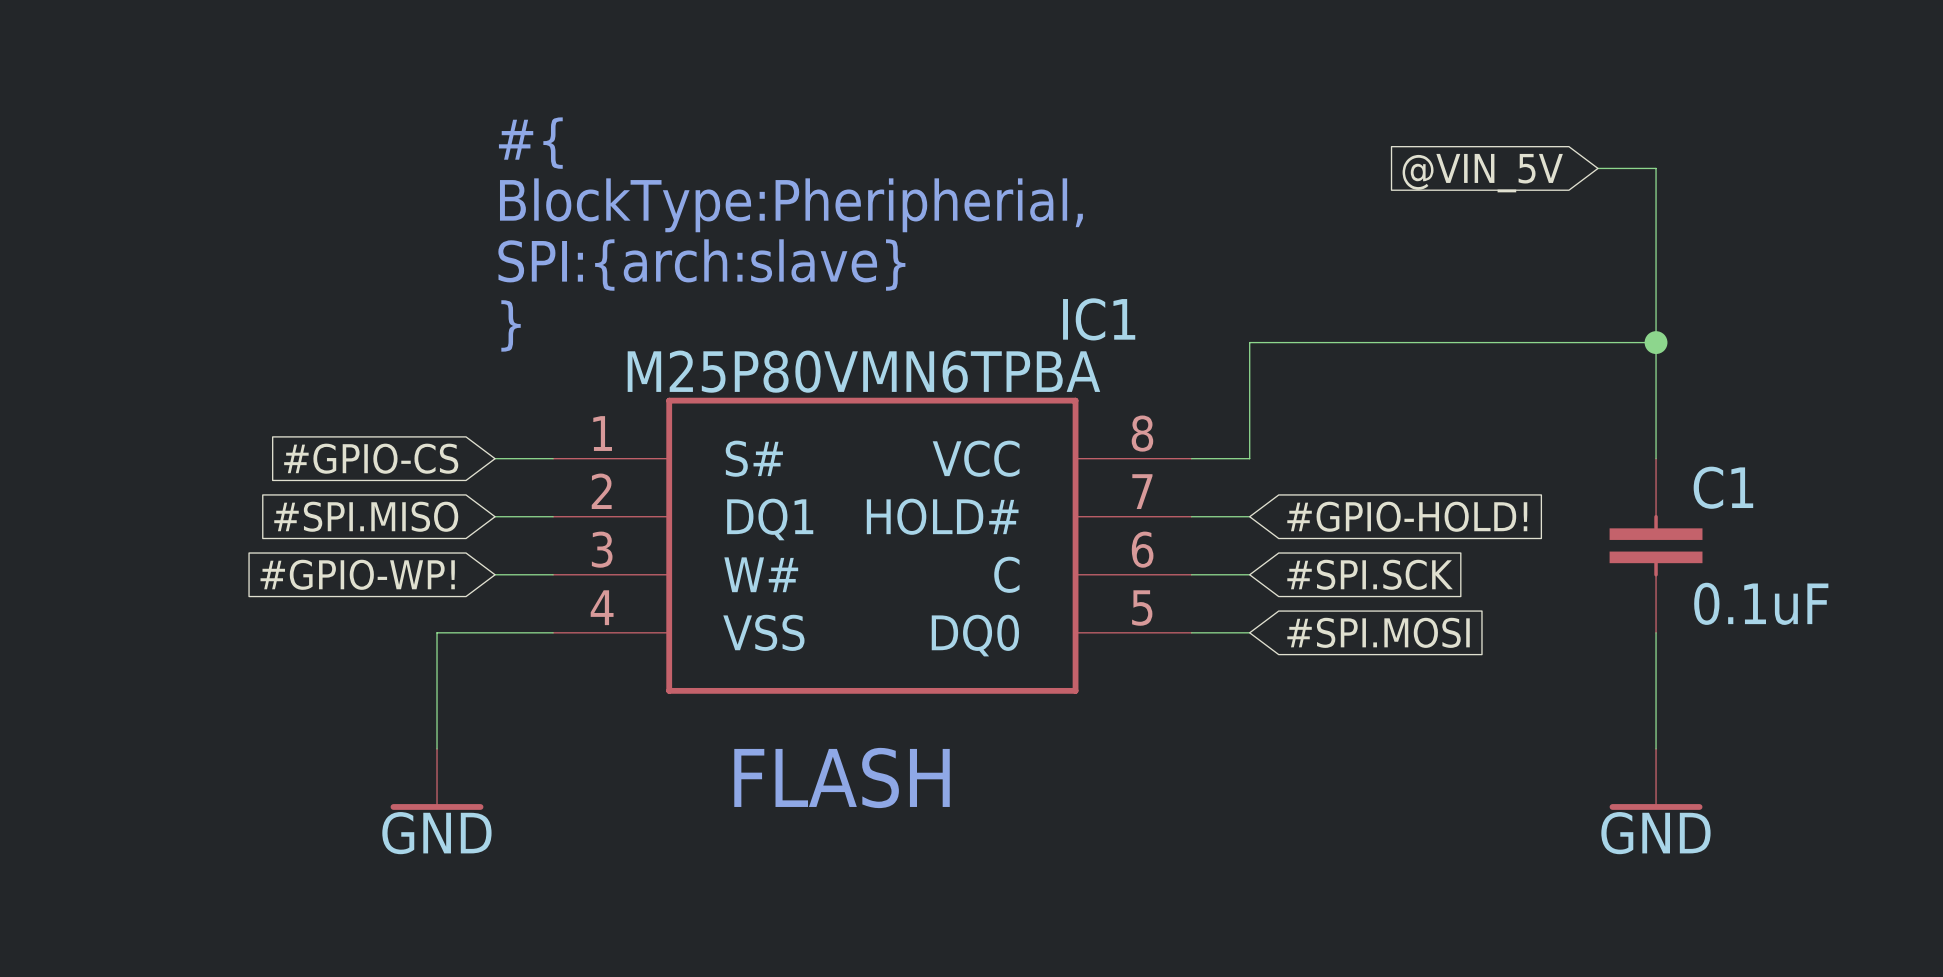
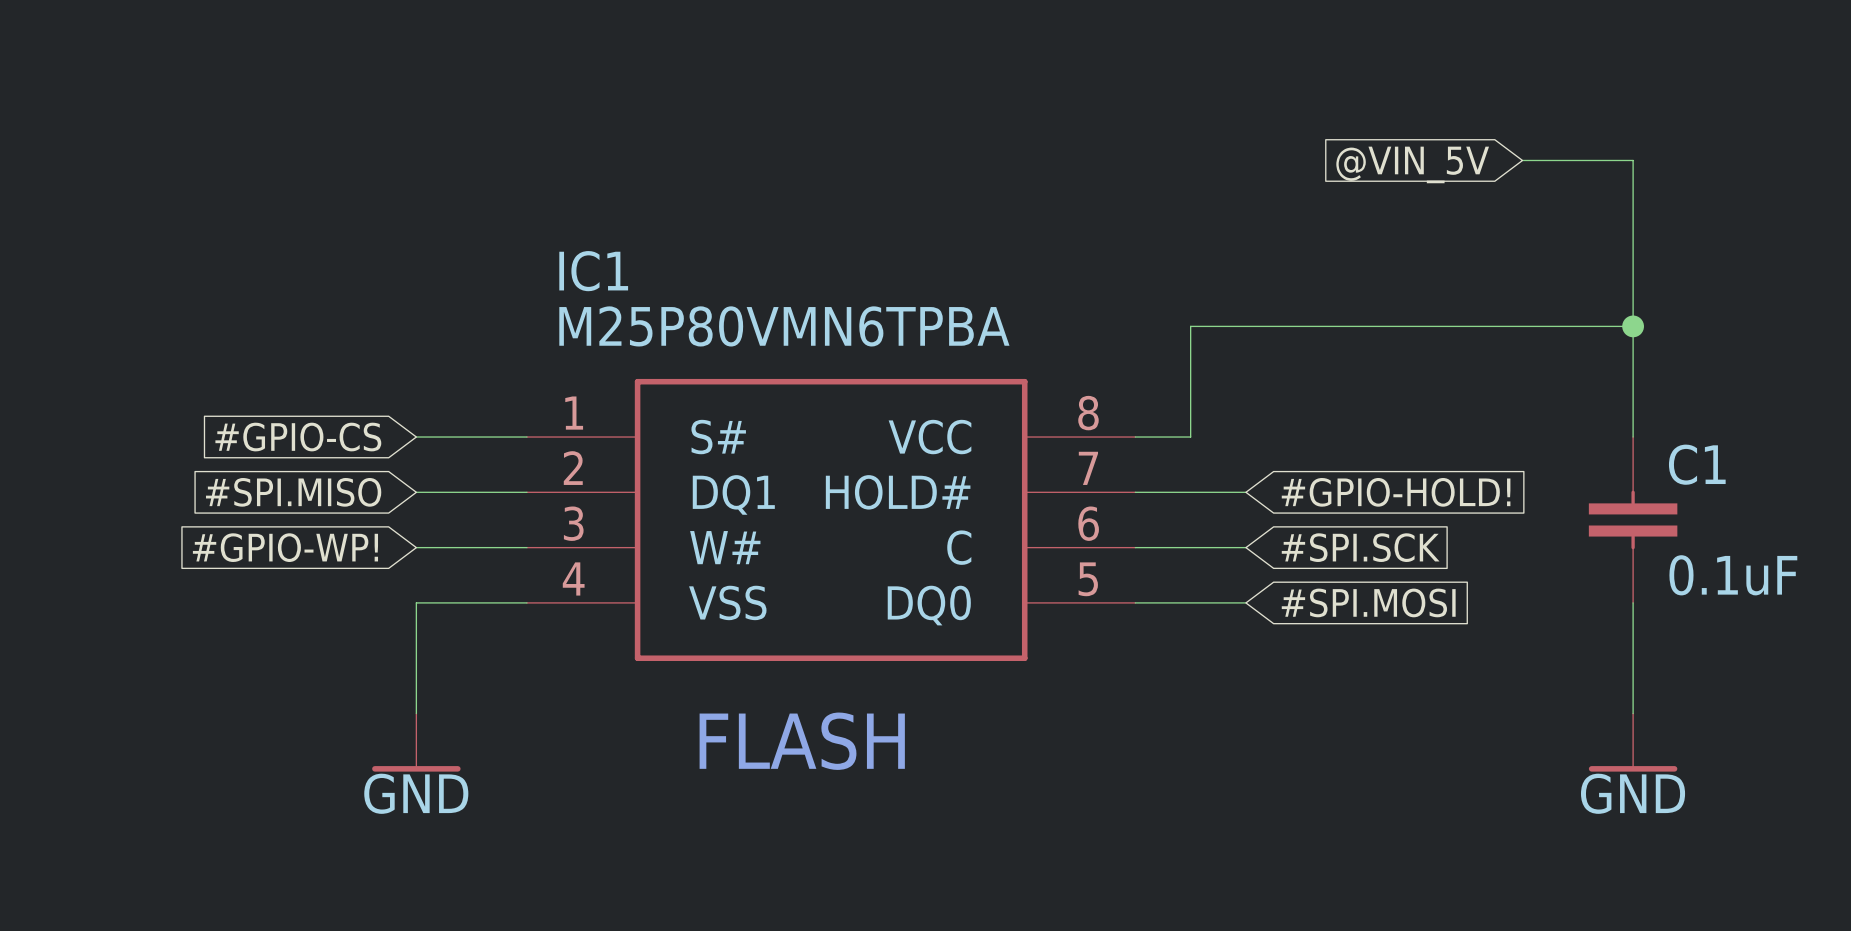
text: #{ (530, 143) -> none
wire: (1656, 168) (1656, 458) -> (1577, 160) (1633, 160) (1633, 437)
text: BlockType:Pheripherial, (791, 205) -> none
text: SPI:{arch:slave} (701, 265) -> none
IC1 name position: IC1 (1099, 319) -> IC1 (593, 271)
text: } (511, 325) -> none
wire: none -> (1577, 326) (1633, 326)
junction position: (1656, 342) -> (1633, 326)
IC1 value position: M25P80VMN6TPBA (863, 371) -> M25P80VMN6TPBA (784, 326)
global label position: #GPIO-CS (371, 458) -> #GPIO-CS (298, 437)
wire: none -> (416, 437) (471, 437)
global label position: #SPI.MISO (366, 516) -> #SPI.MISO (293, 492)
wire: none -> (416, 492) (471, 492)
wire: none -> (1190, 492) (1245, 492)
global label position: #GPIO-HOLD! (1407, 516) -> #GPIO-HOLD! (1396, 492)
C1 position: (1656, 545) -> (1633, 519)
global label position: #GPIO-WP! (357, 574) -> #GPIO-WP! (285, 547)
wire: none -> (416, 547) (471, 547)
wire: none -> (1190, 547) (1245, 547)
global label position: #SPI.SCK (1370, 574) -> #SPI.SCK (1360, 547)
wire: none -> (1190, 602) (1245, 602)
global label position: #SPI.MOSI (1378, 632) -> #SPI.MOSI (1368, 602)
wire: (1656, 632) (1656, 748) -> (1633, 602) (1633, 713)
power symbol position: GND (1656, 779) -> GND (1633, 742)

